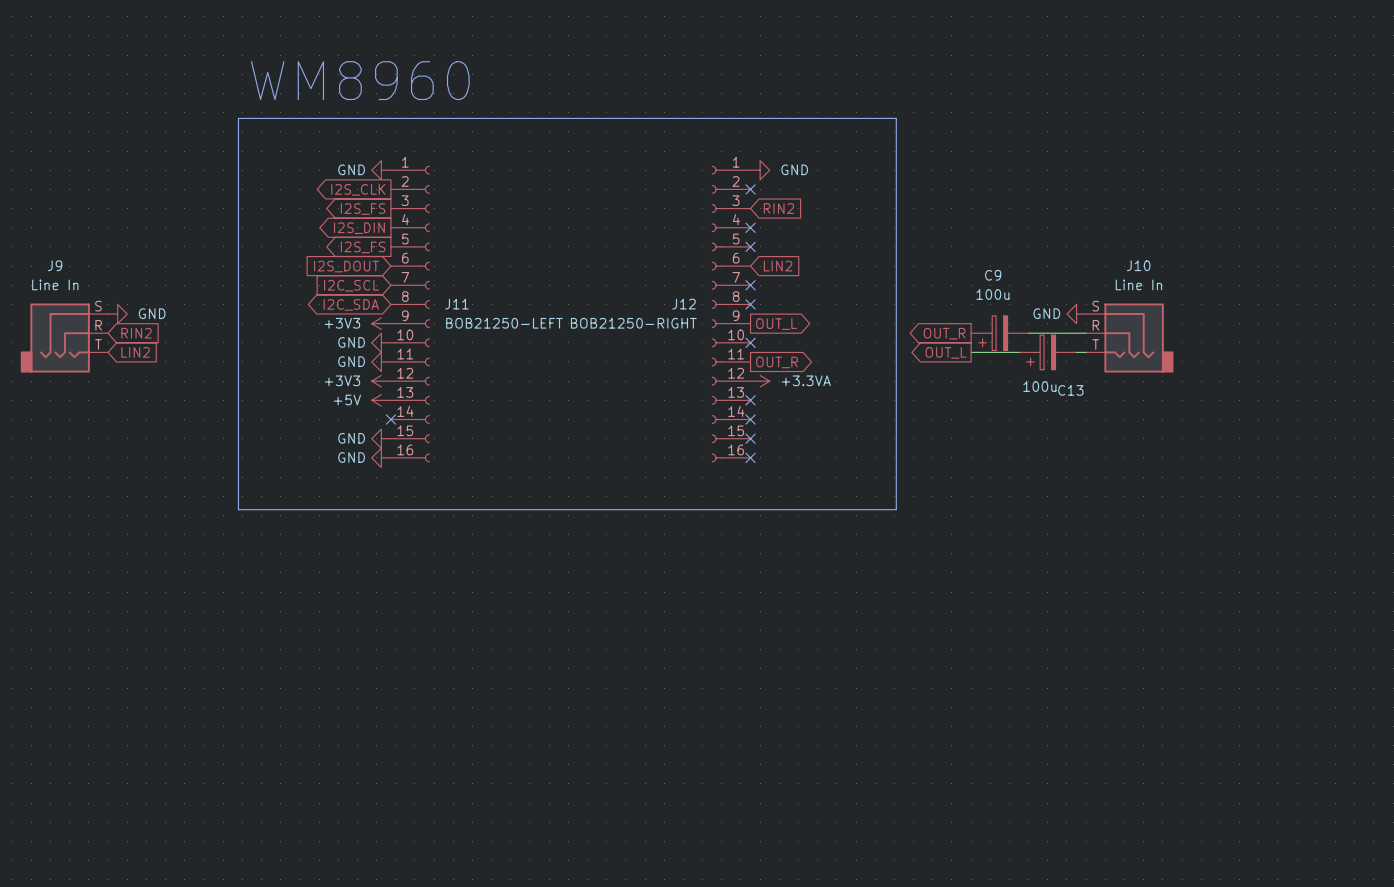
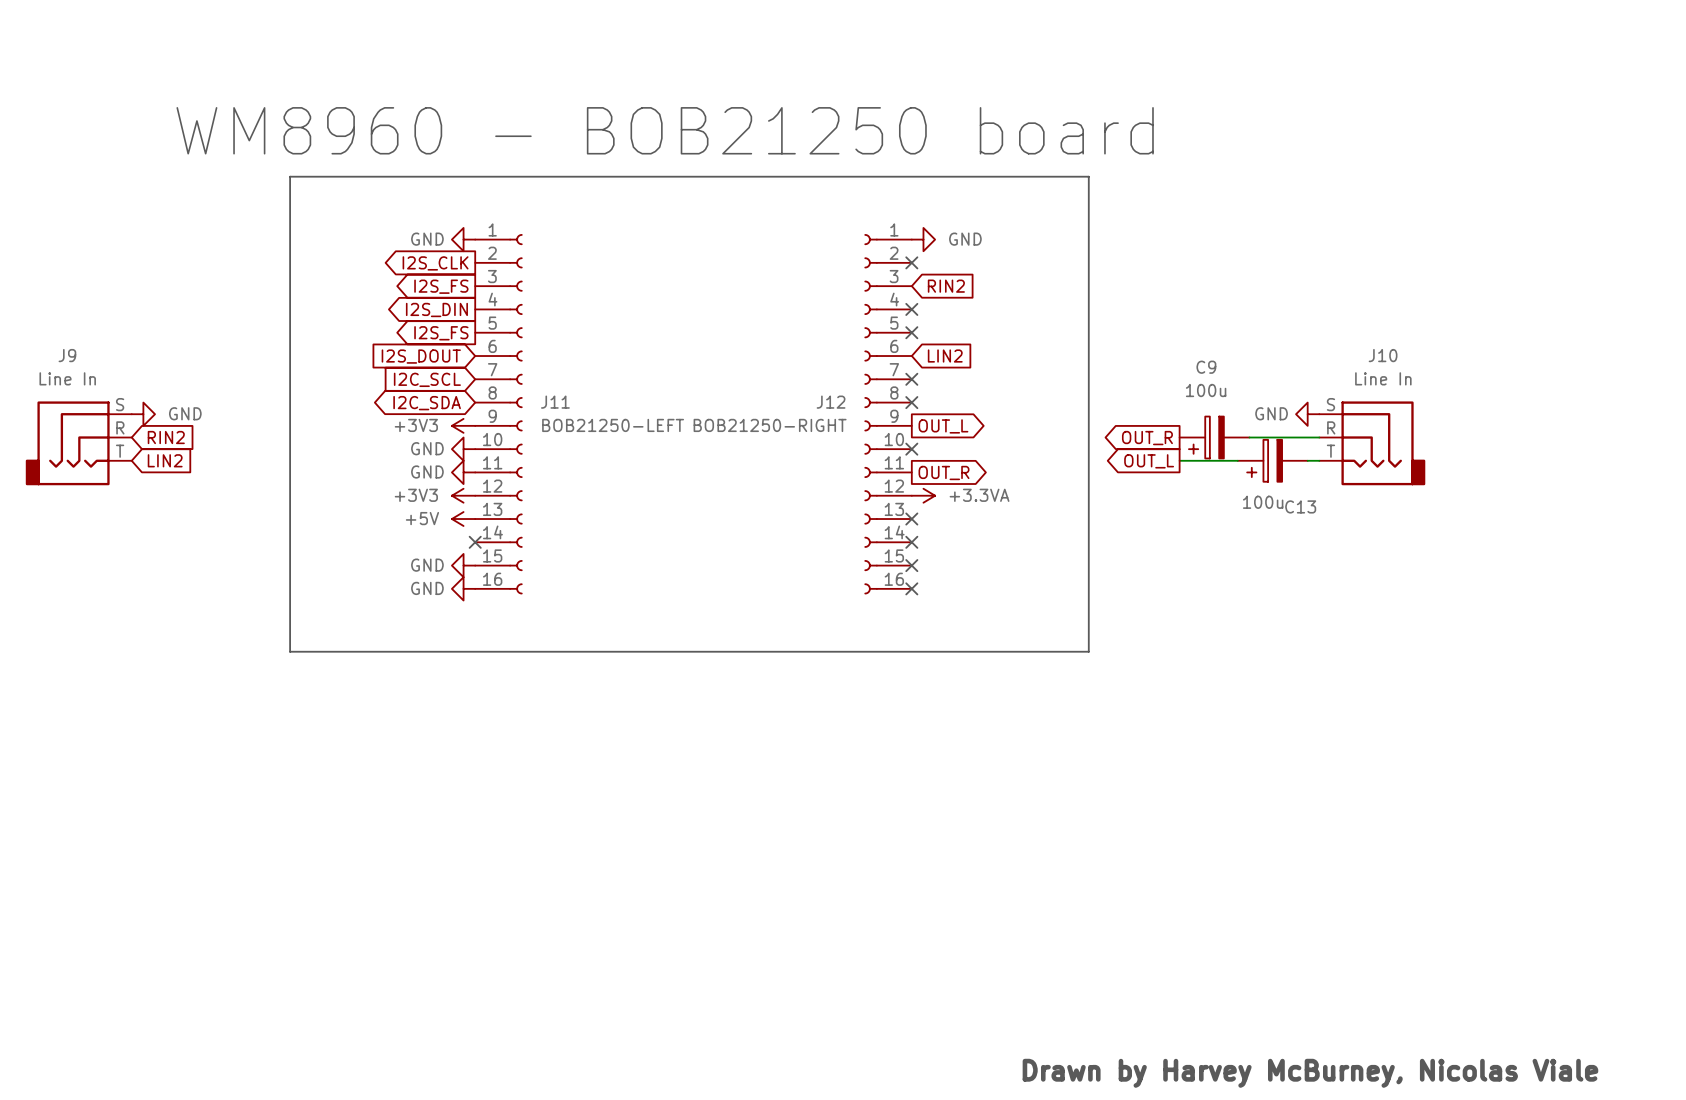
text: WM8960 (360, 80) -> none
text: none -> WM8960 - BOB21250 board (665, 130)
text: none -> Drawn by Harvey McBurney, Nicolas Viale (1310, 1073)

